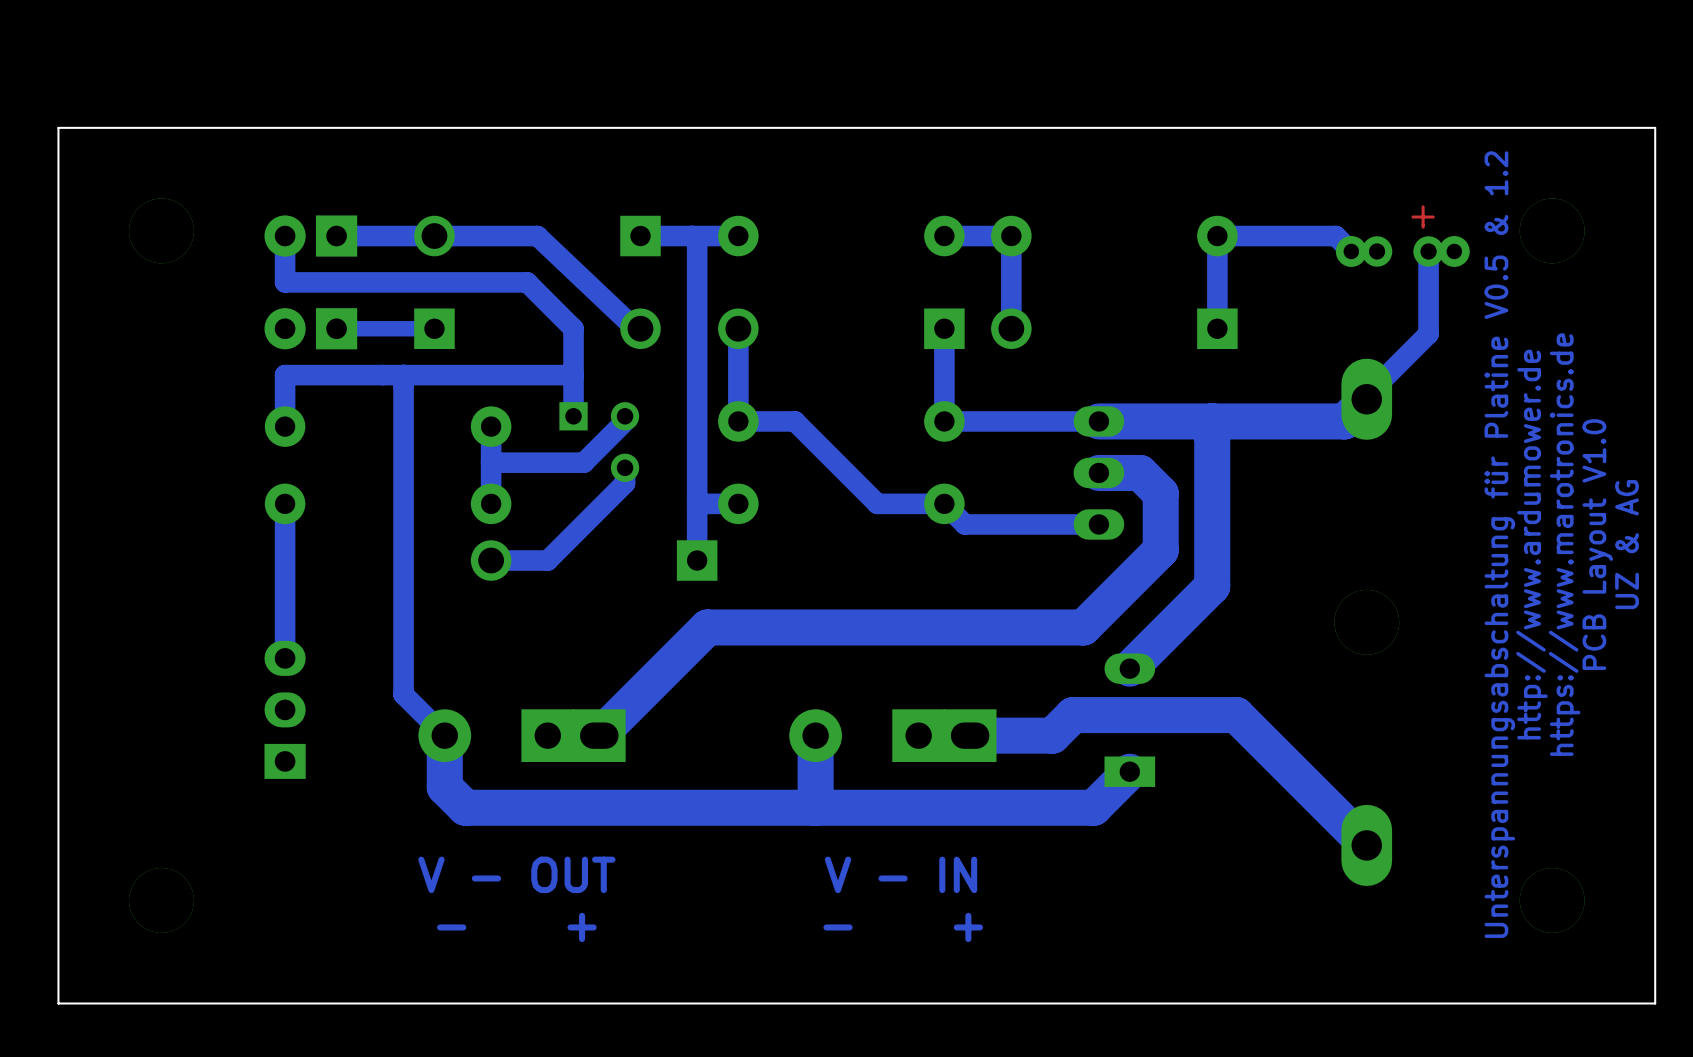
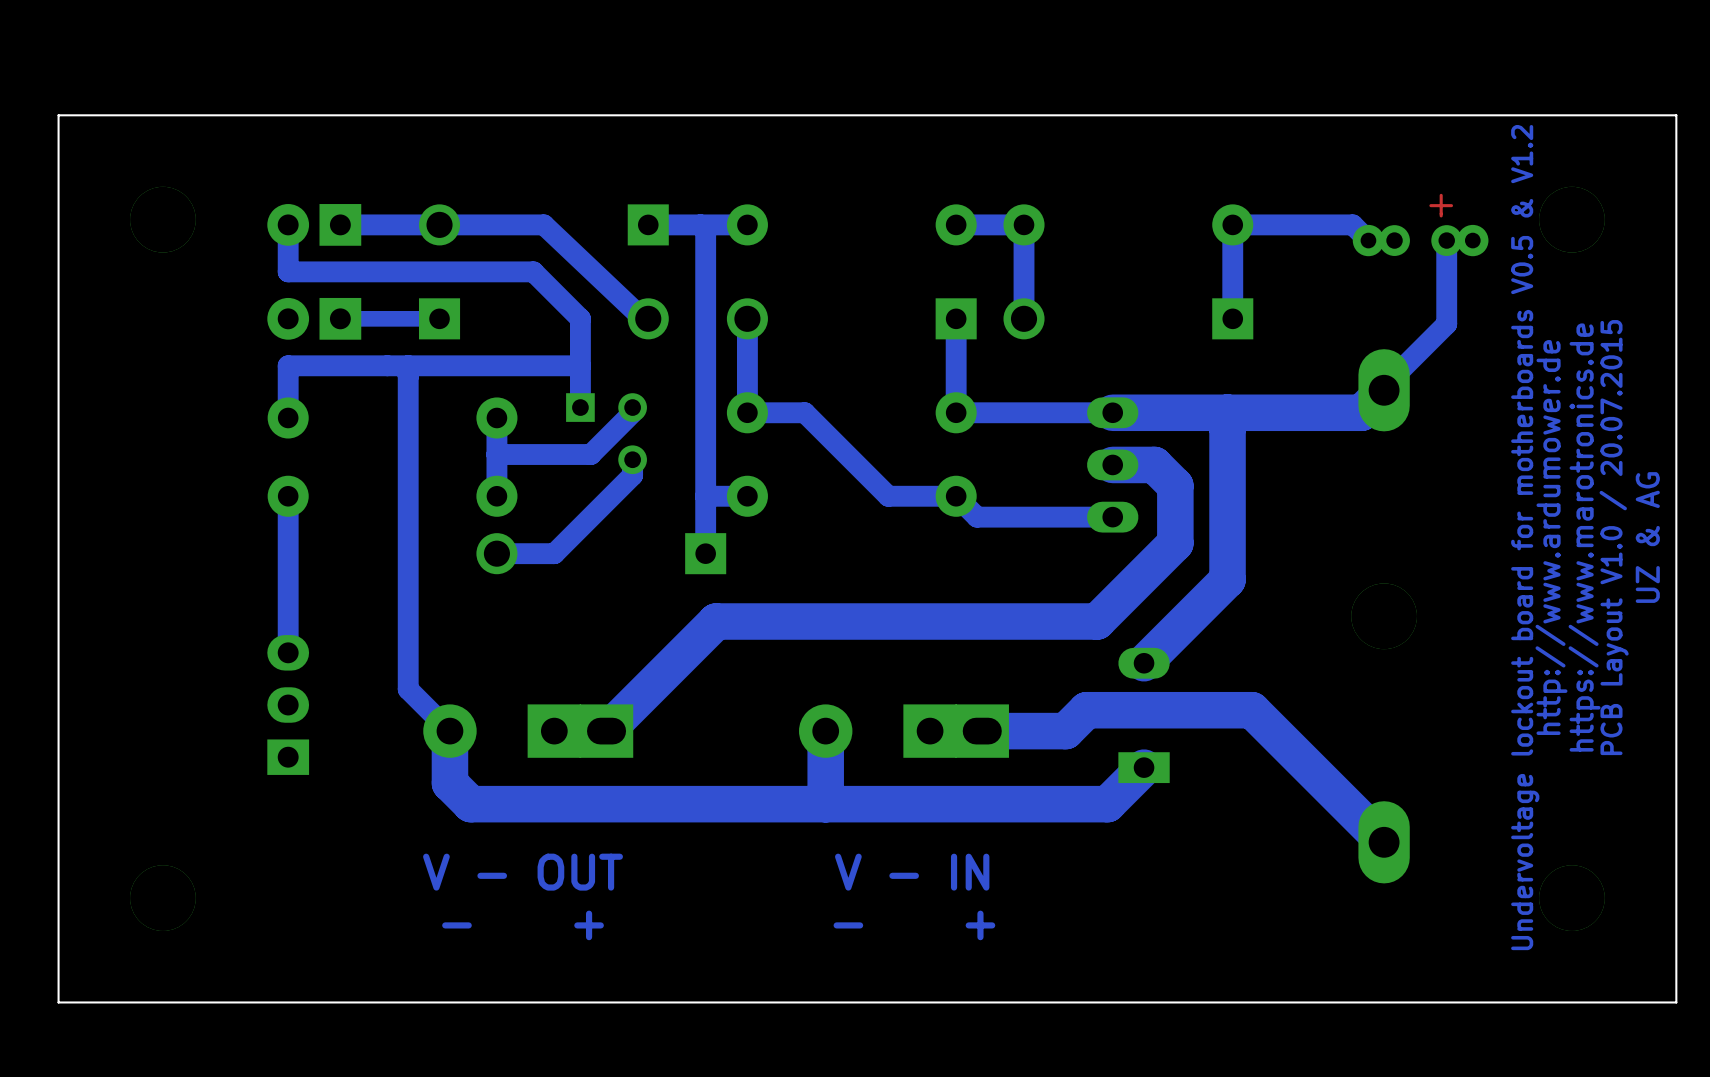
text: Unterspannungsabschaltung für Platine V0.5 & 1.2 (1499, 544) -> Undervoltage lockout board for motherboards V0.5 & V1.2 (1525, 537)
text: PCB Layout V1.0 (1597, 544) -> PCB Layout V1.0 / 20.07.2015 (1614, 537)

